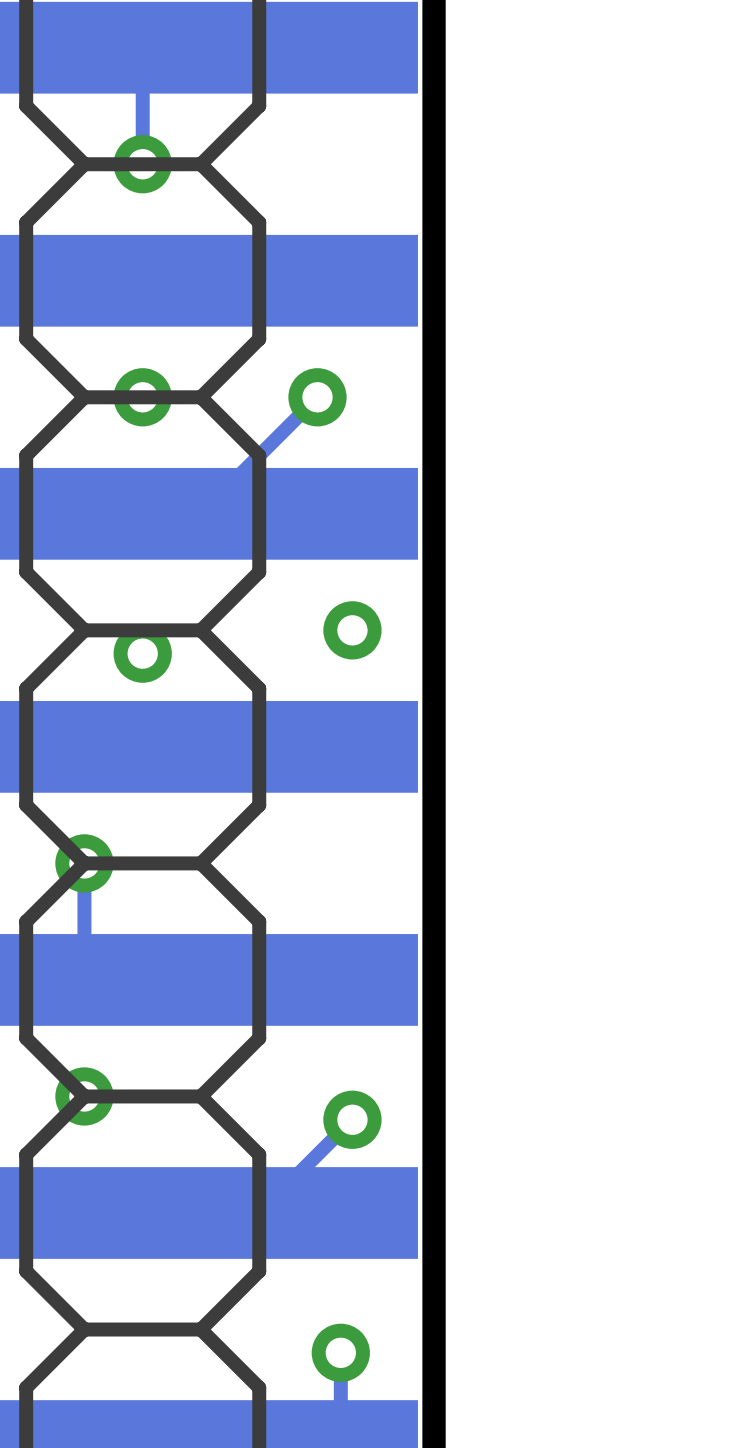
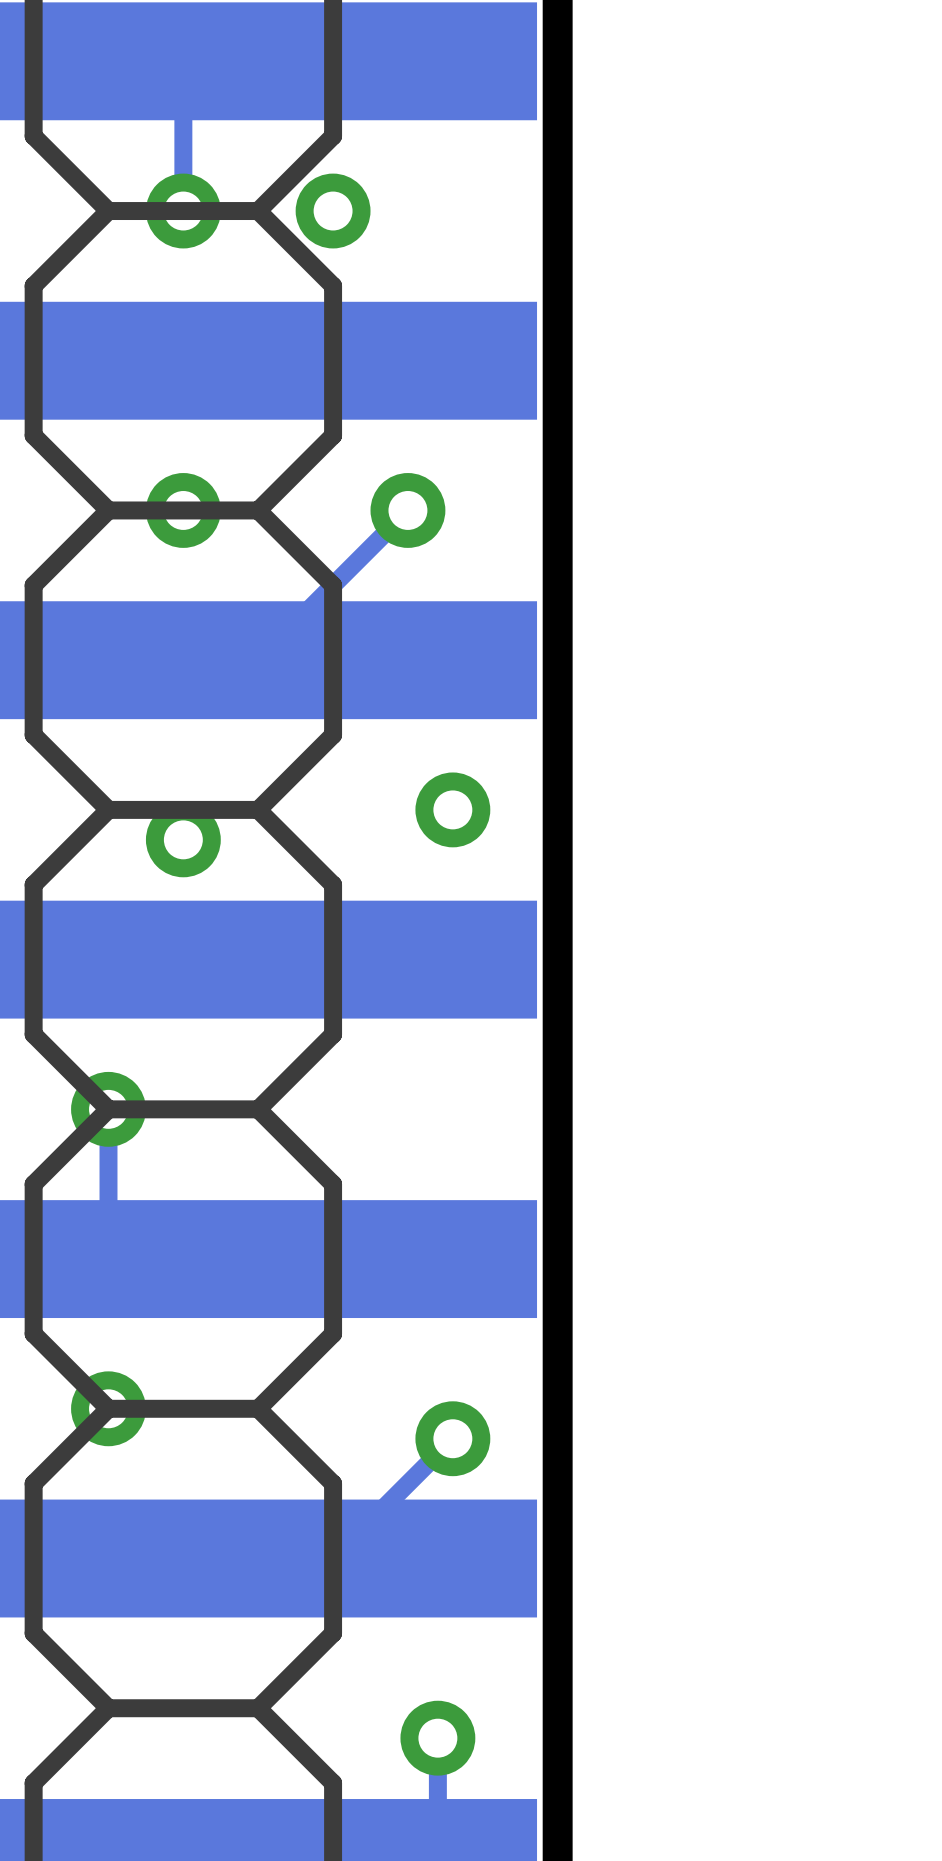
via: none -> (333, 211)

